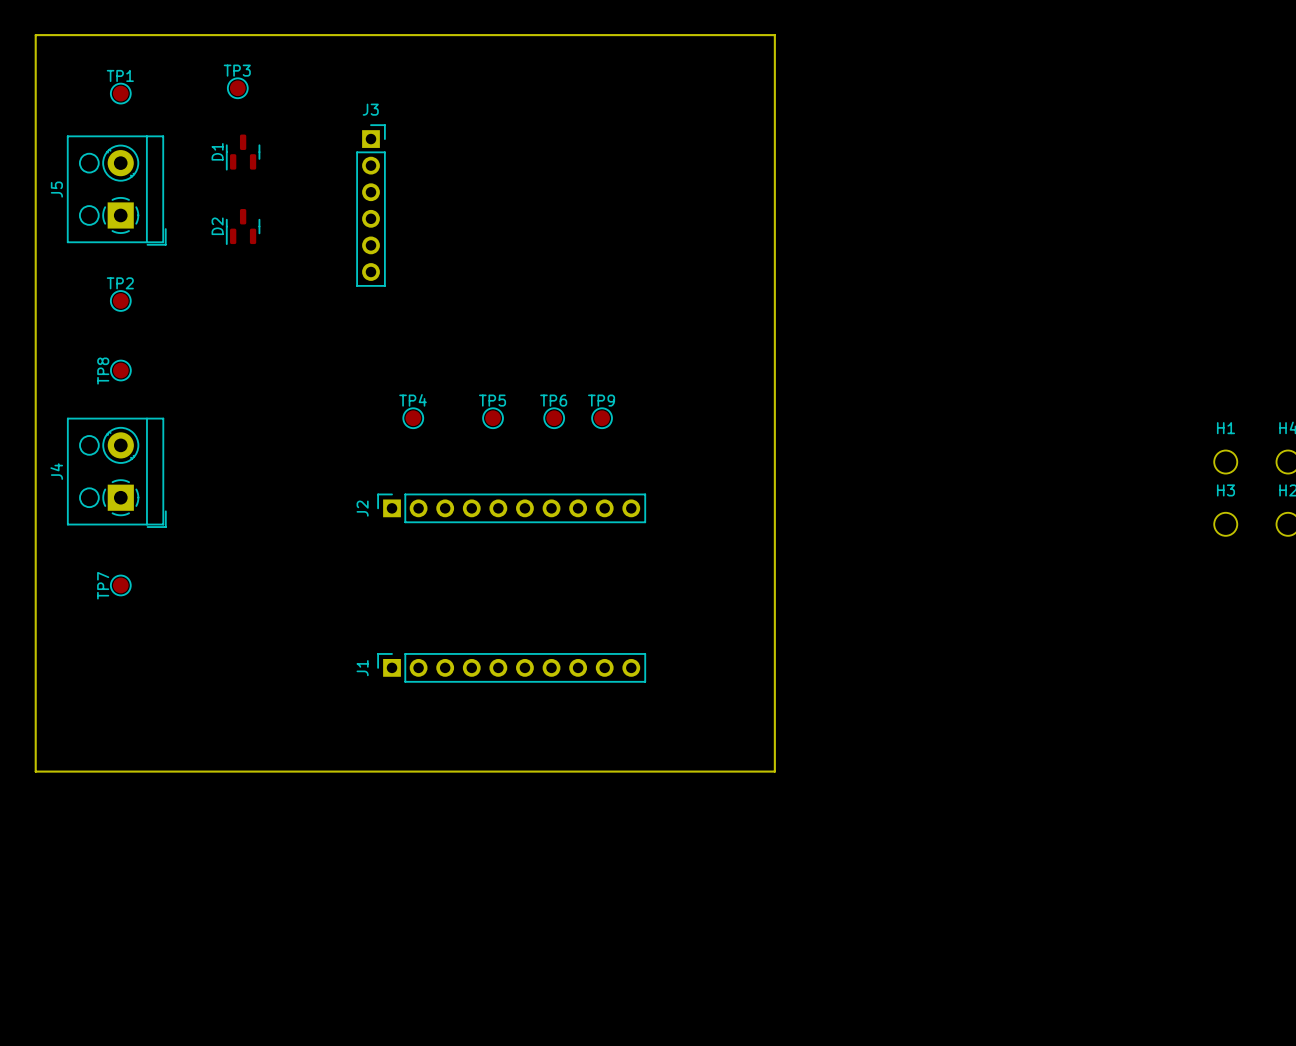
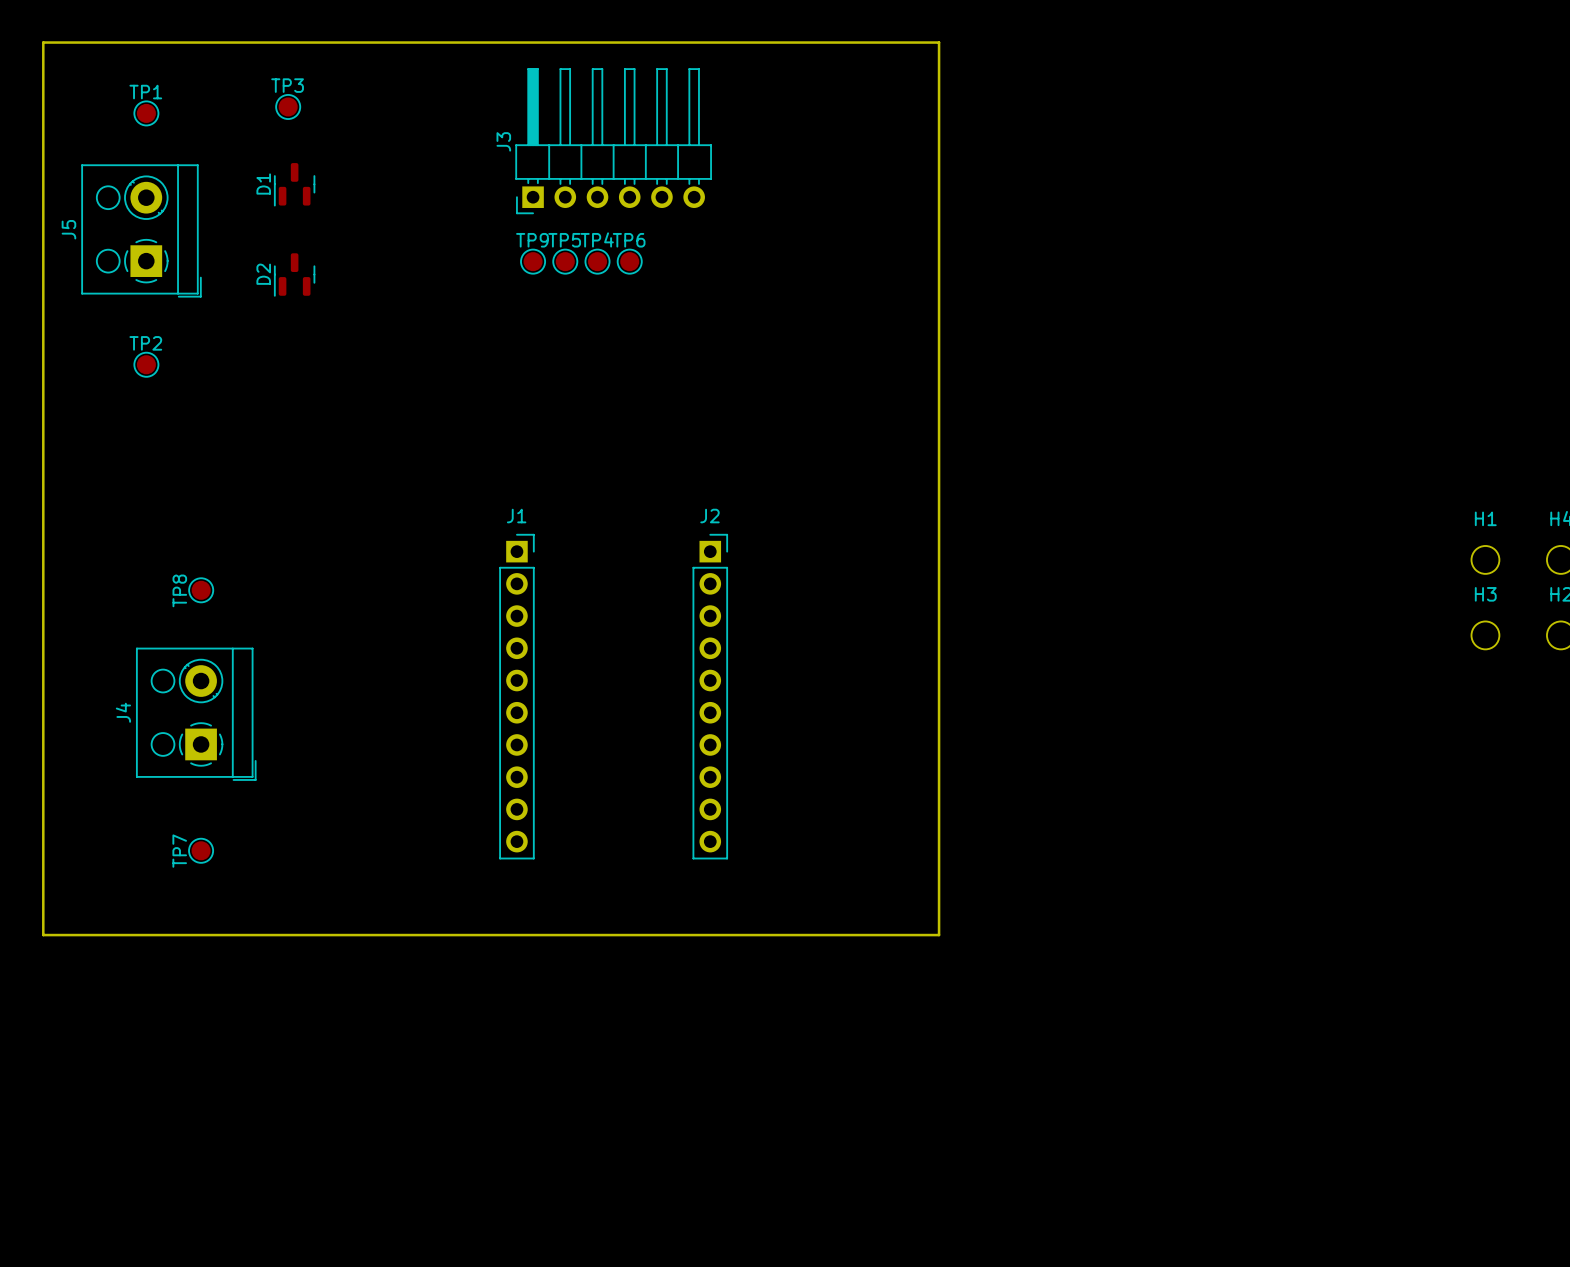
J3 name position: J3 (370, 109) -> J3 (503, 141)
J3 footprint: [356, 124, 386, 287] -> [515, 68, 712, 215]
TP8 position: (120, 370) -> (201, 590)
TP4 position: (413, 418) -> (597, 261)
TP5 position: (493, 418) -> (565, 261)
TP6 position: (554, 418) -> (629, 261)
TP9 position: (602, 418) -> (533, 261)
J4 position: (116, 472) -> (196, 714)
J2 rotation: 0° (511, 508) -> 90° clockwise (710, 696)
TP7 position: (120, 585) -> (201, 850)
J1 rotation: 0° (511, 667) -> 90° clockwise (516, 696)

